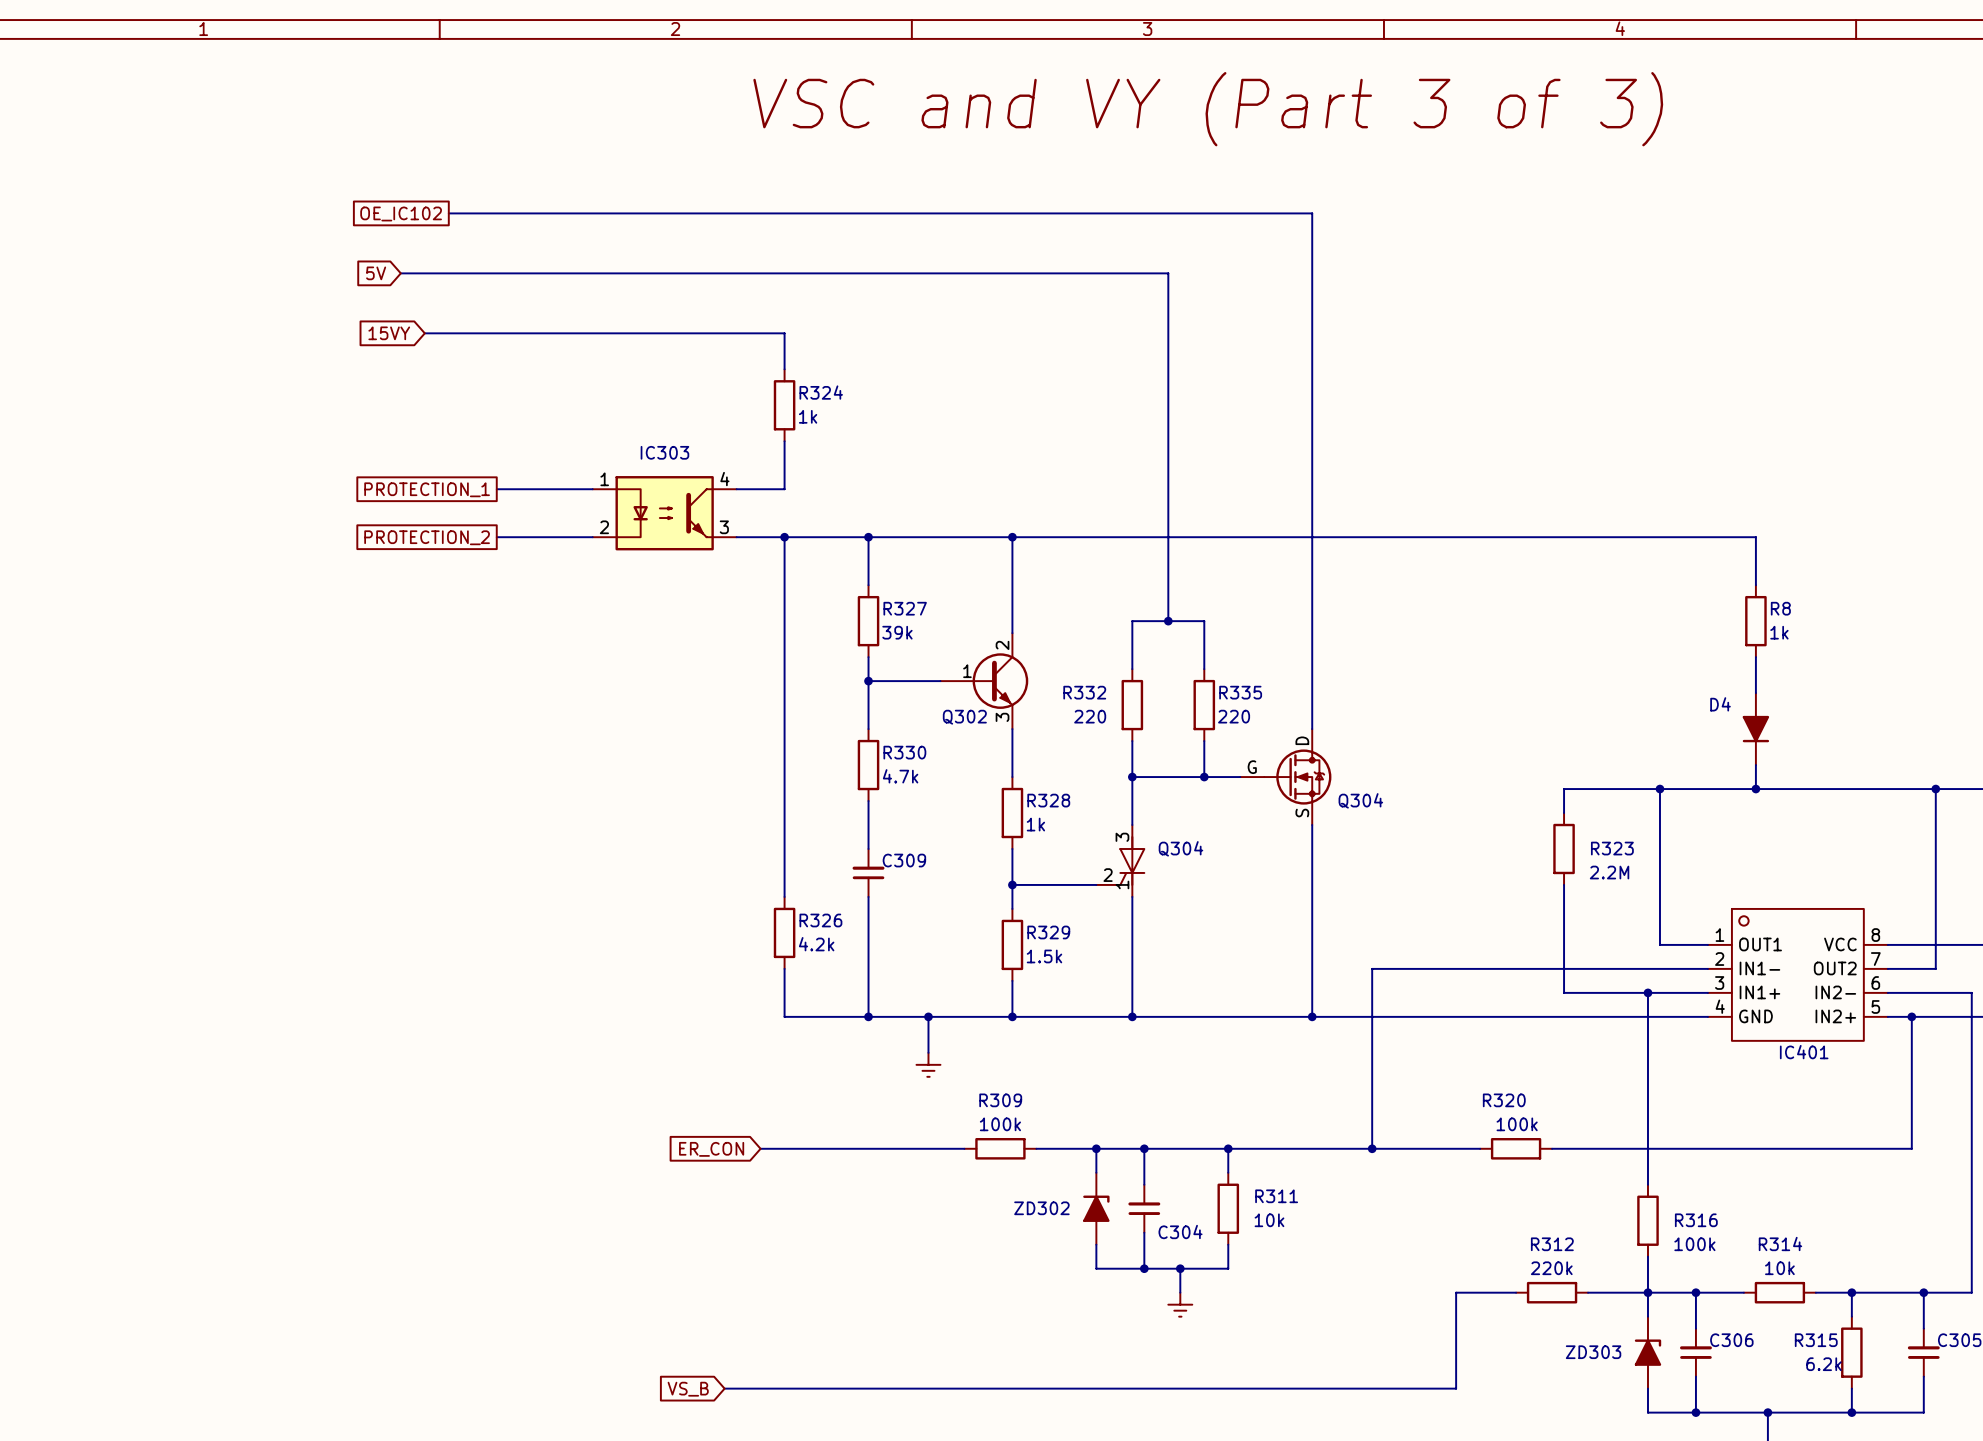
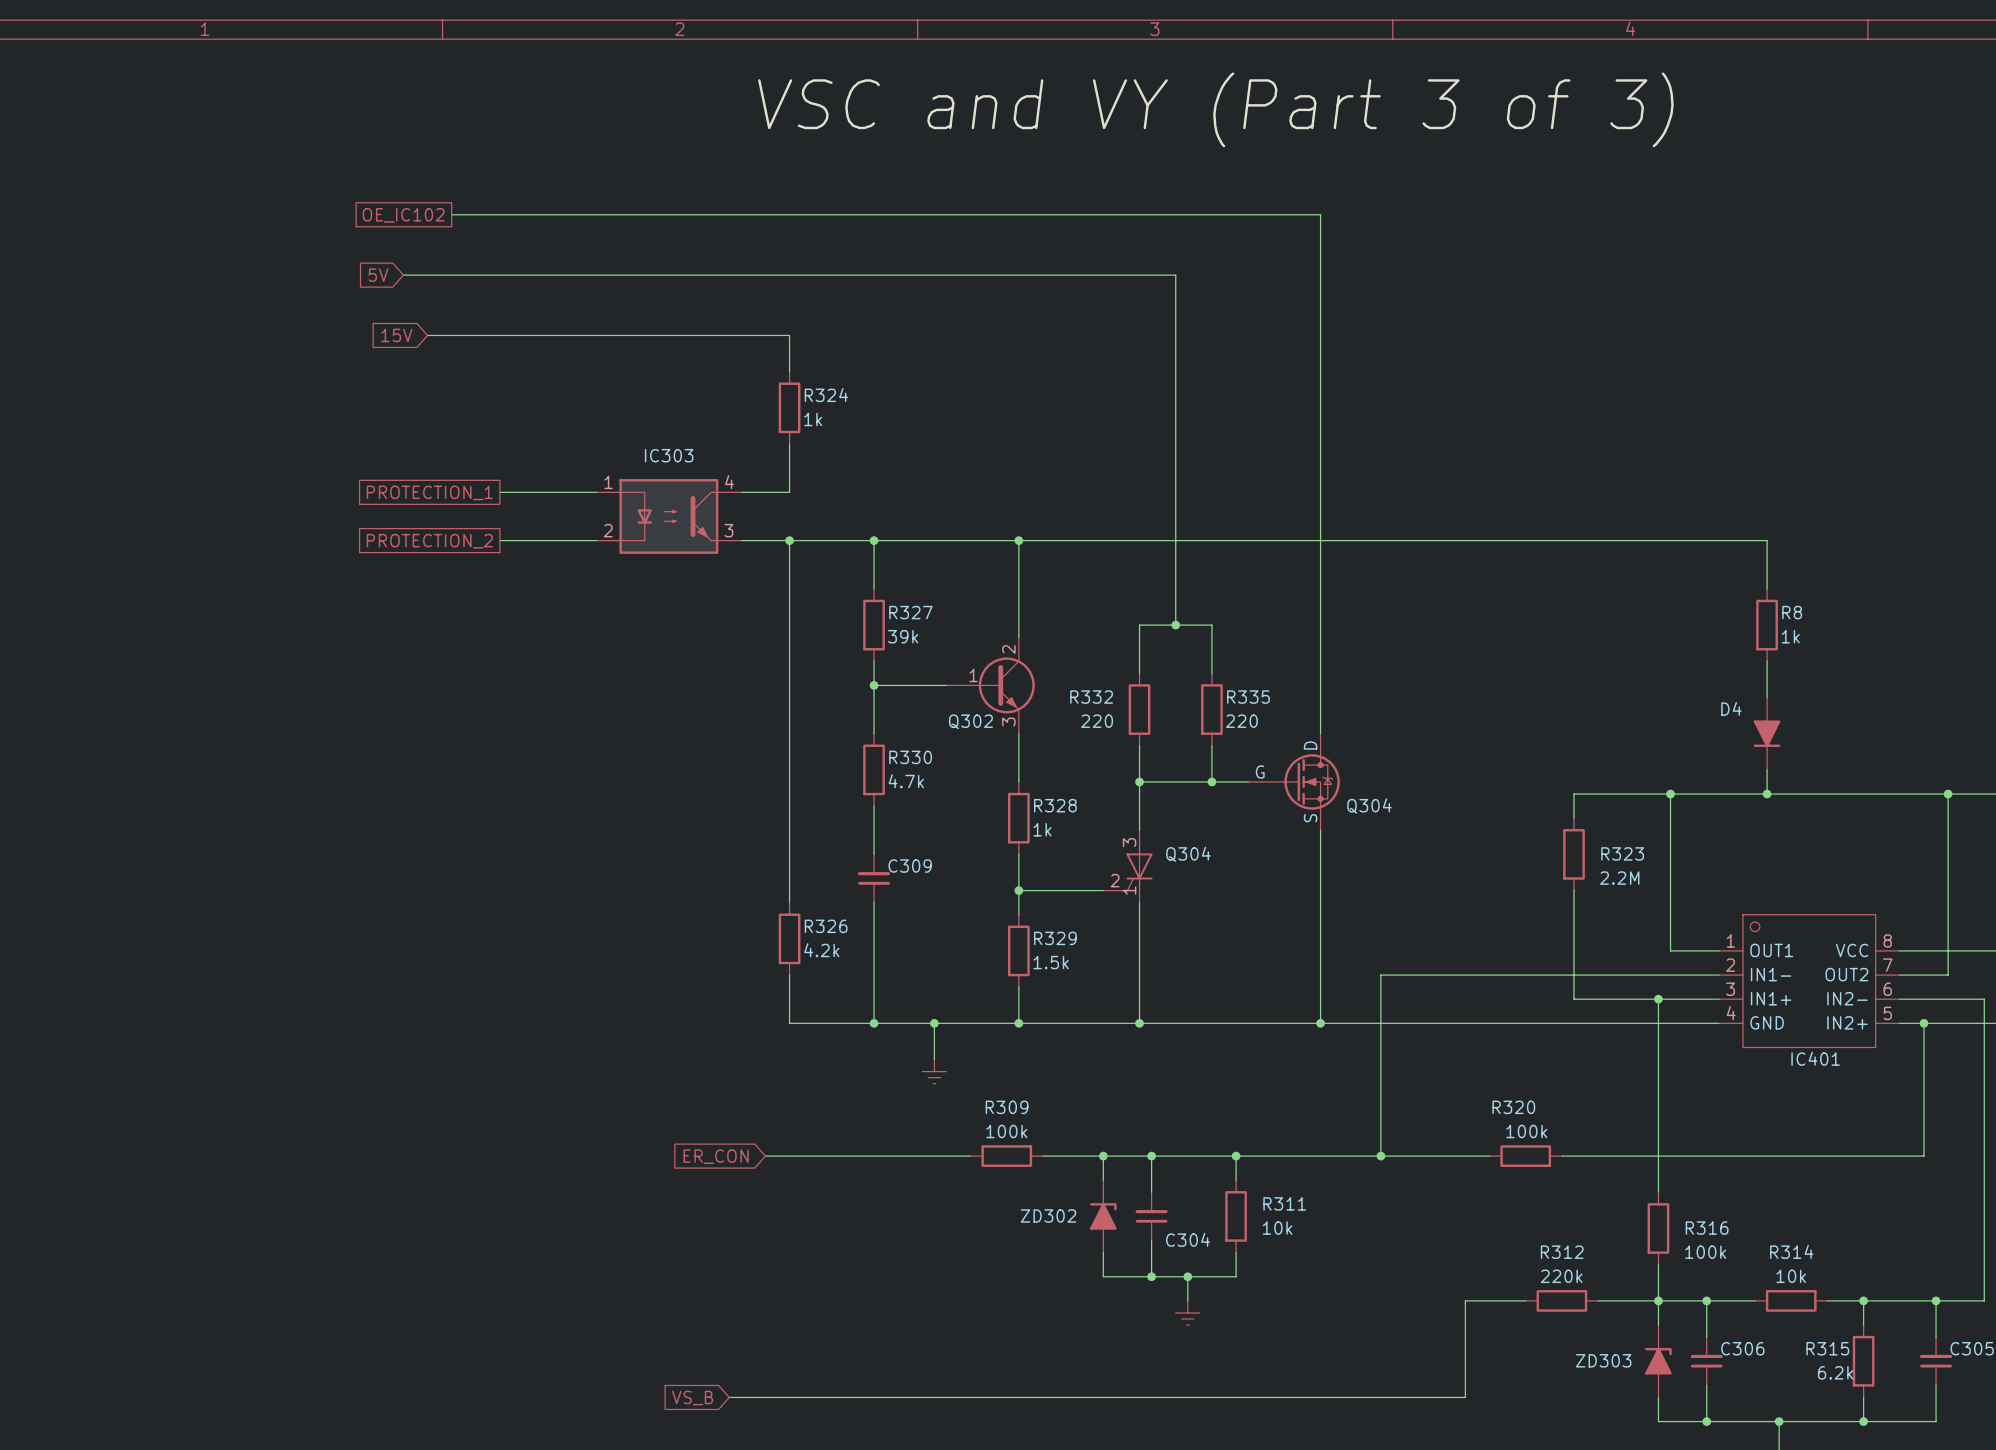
global label: 15VY (389, 333) -> 15V (396, 335)

